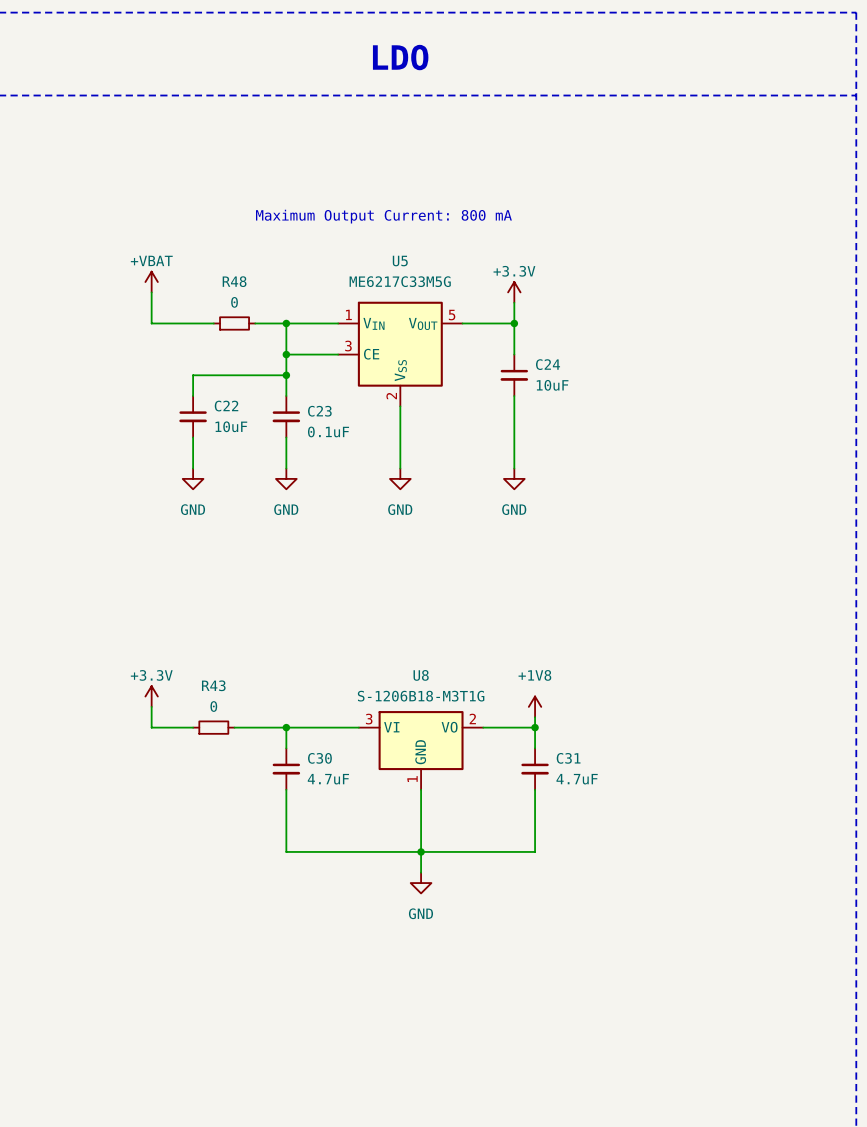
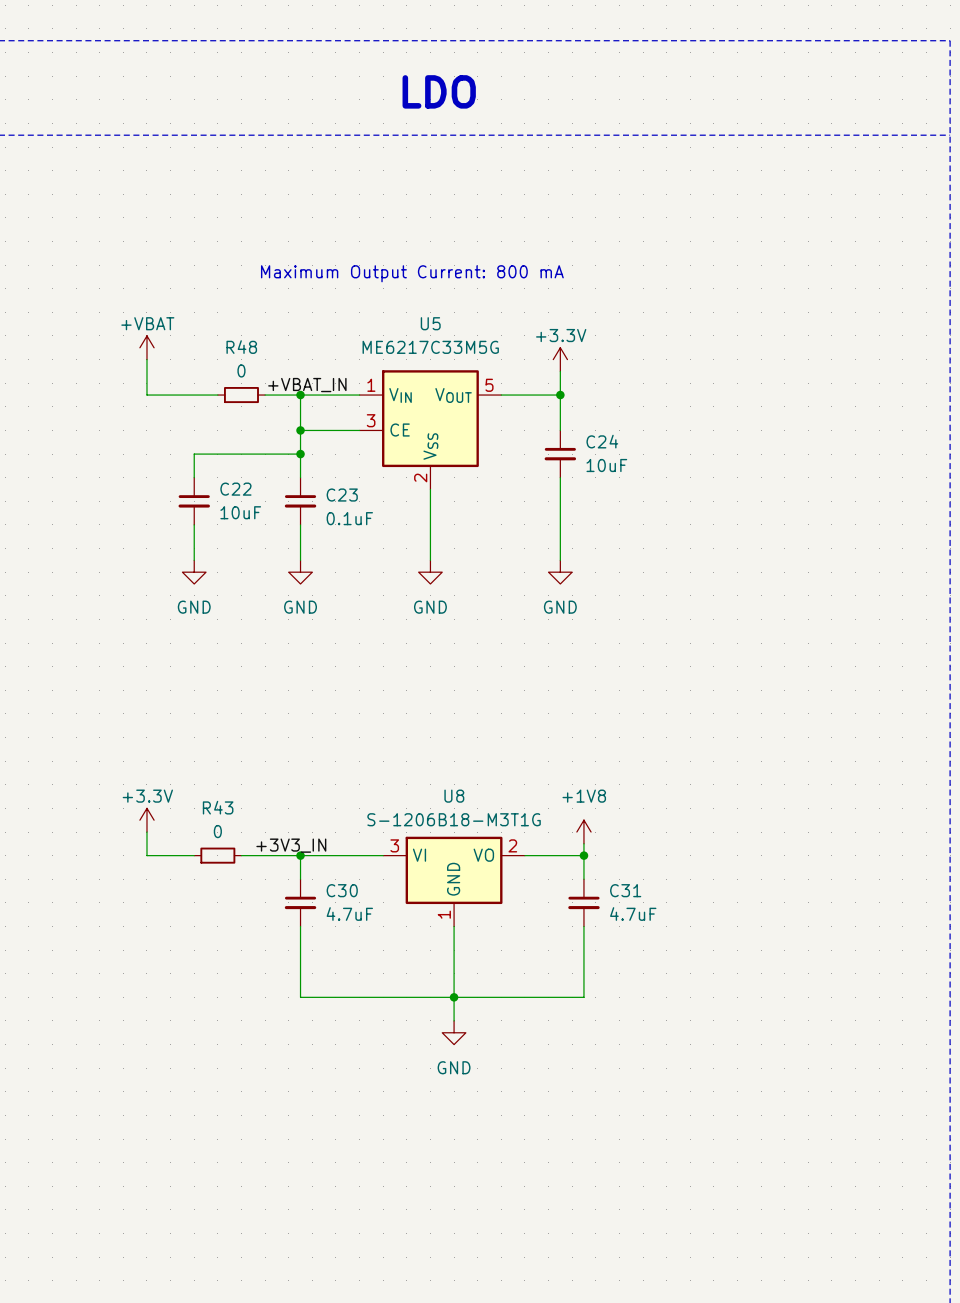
label: none -> +VBAT_IN (307, 385)
label: none -> +3V3_IN (291, 845)

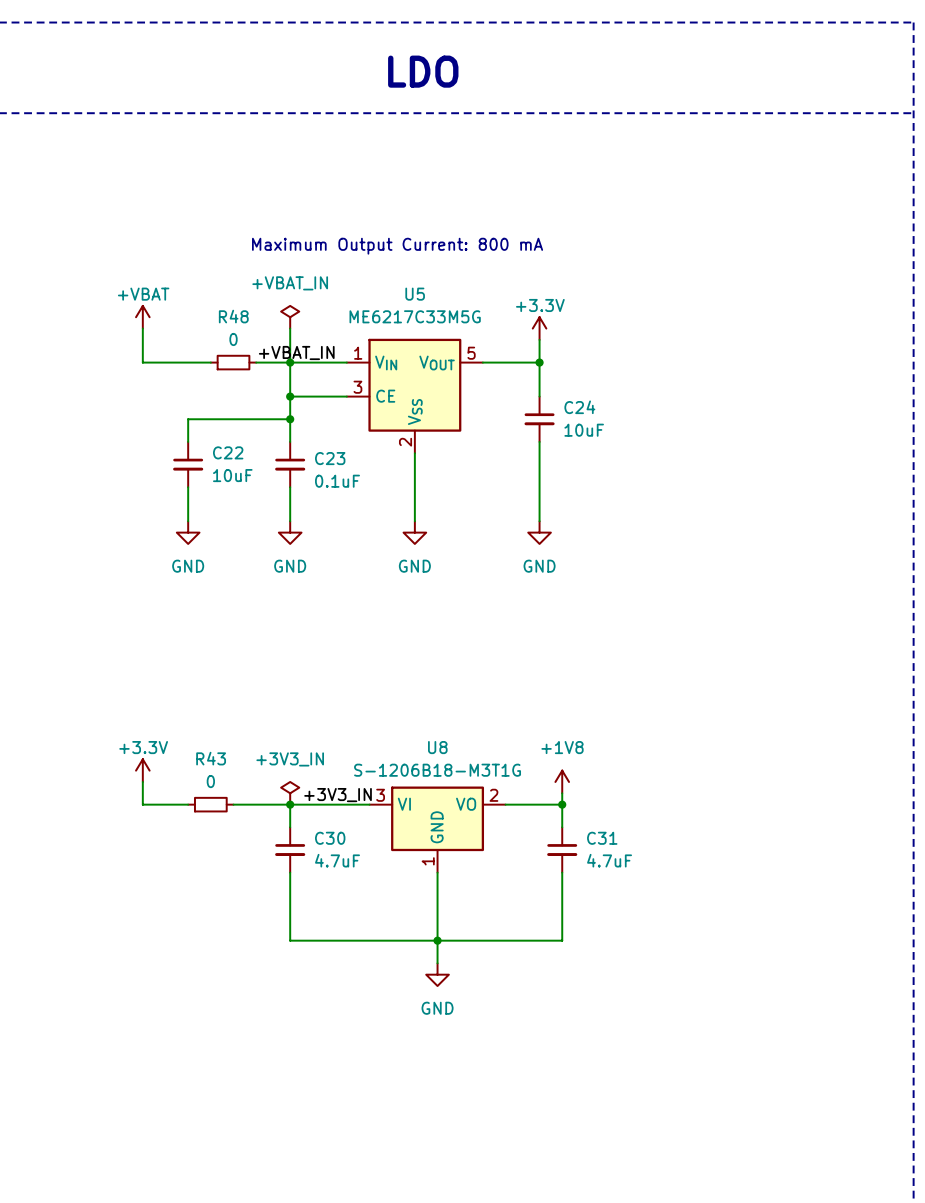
power symbol: none -> +VBAT_IN (290, 317)
wire: none -> (290, 328) (290, 362)
power symbol: none -> +3V3_IN (290, 793)
label position: +3V3_IN (291, 845) -> +3V3_IN (338, 795)

